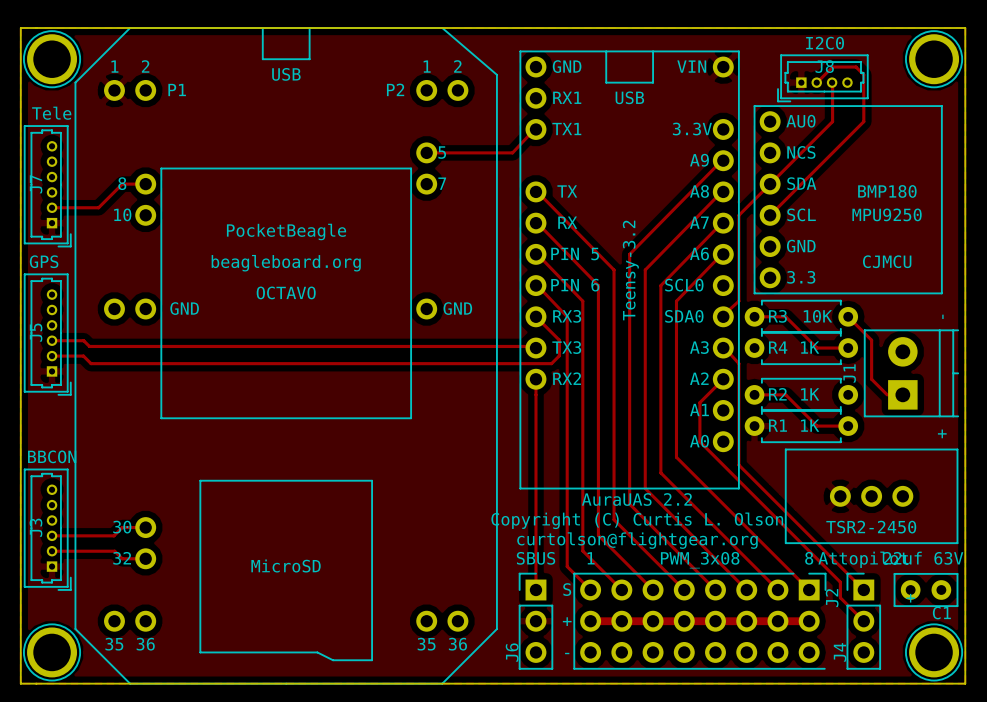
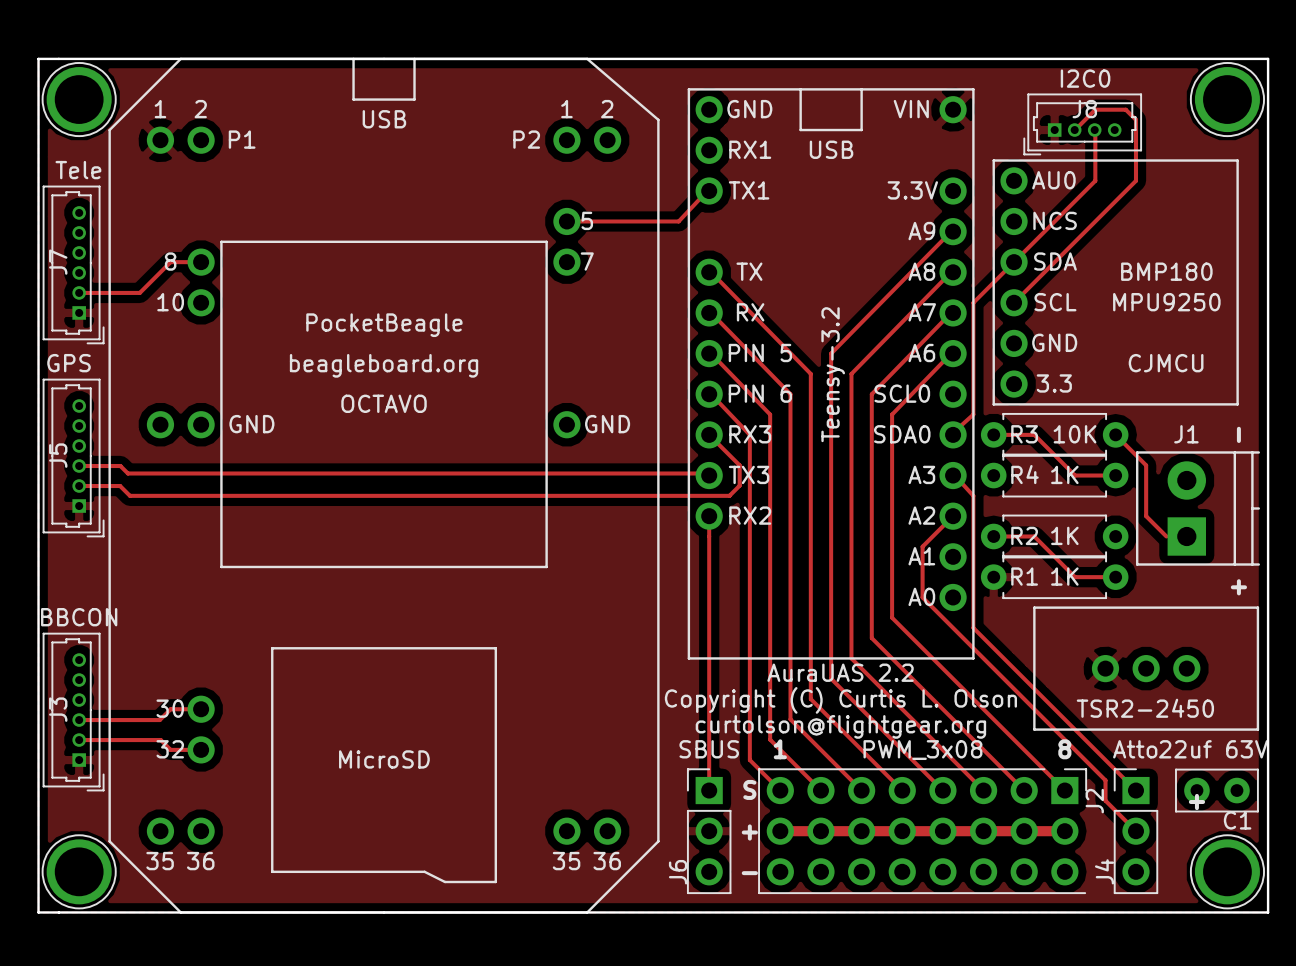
J1 name rotation: 0° (849, 373) -> 90° clockwise (1186, 434)
J1 name position: J1 (849, 373) -> J1 (1186, 434)
J4 value: Attopilot (863, 559) -> Atto (1135, 749)

